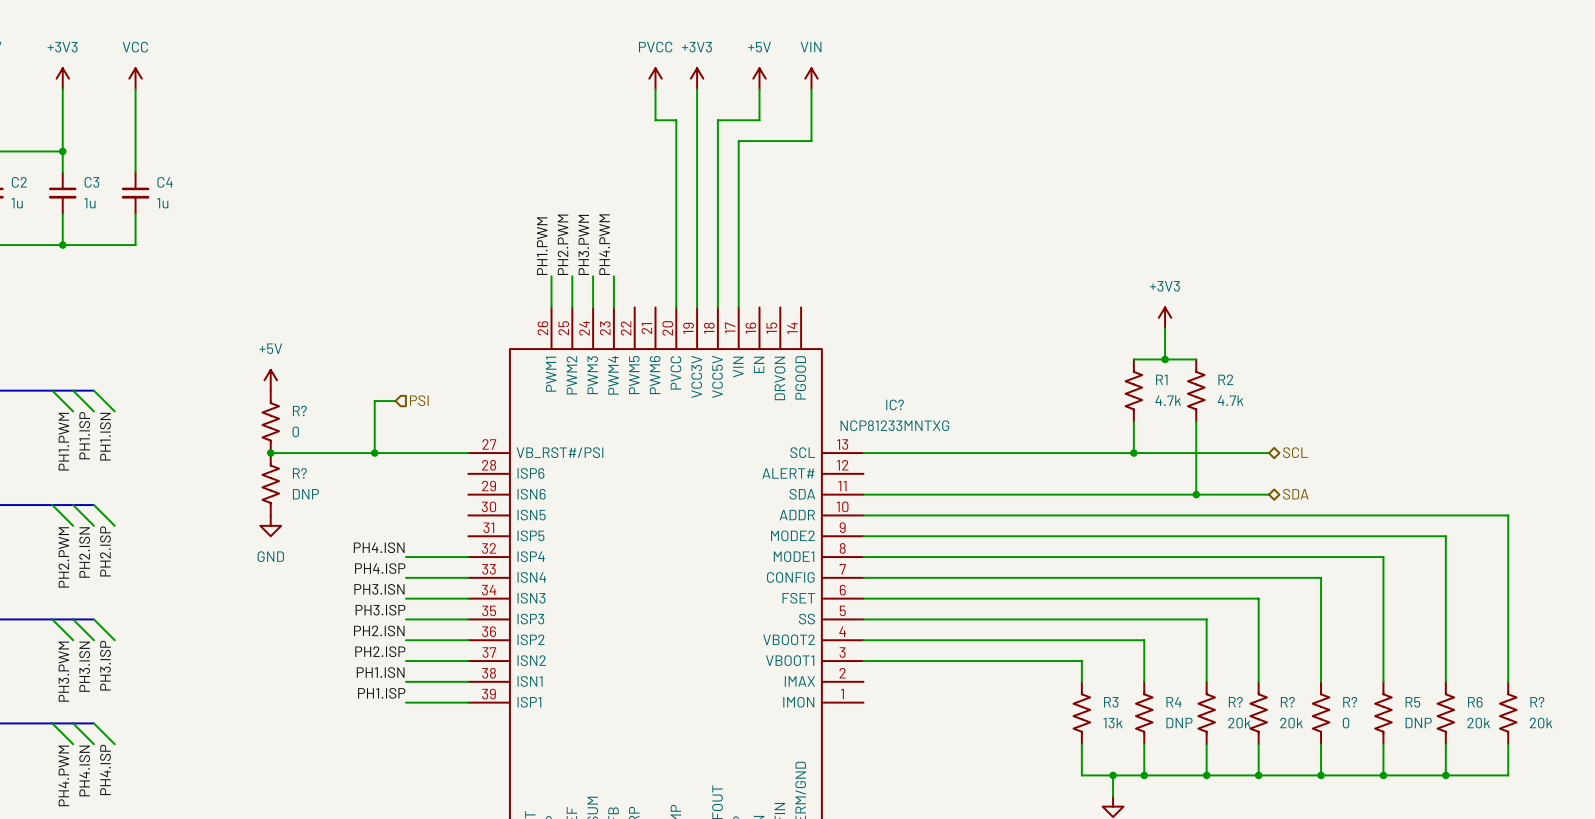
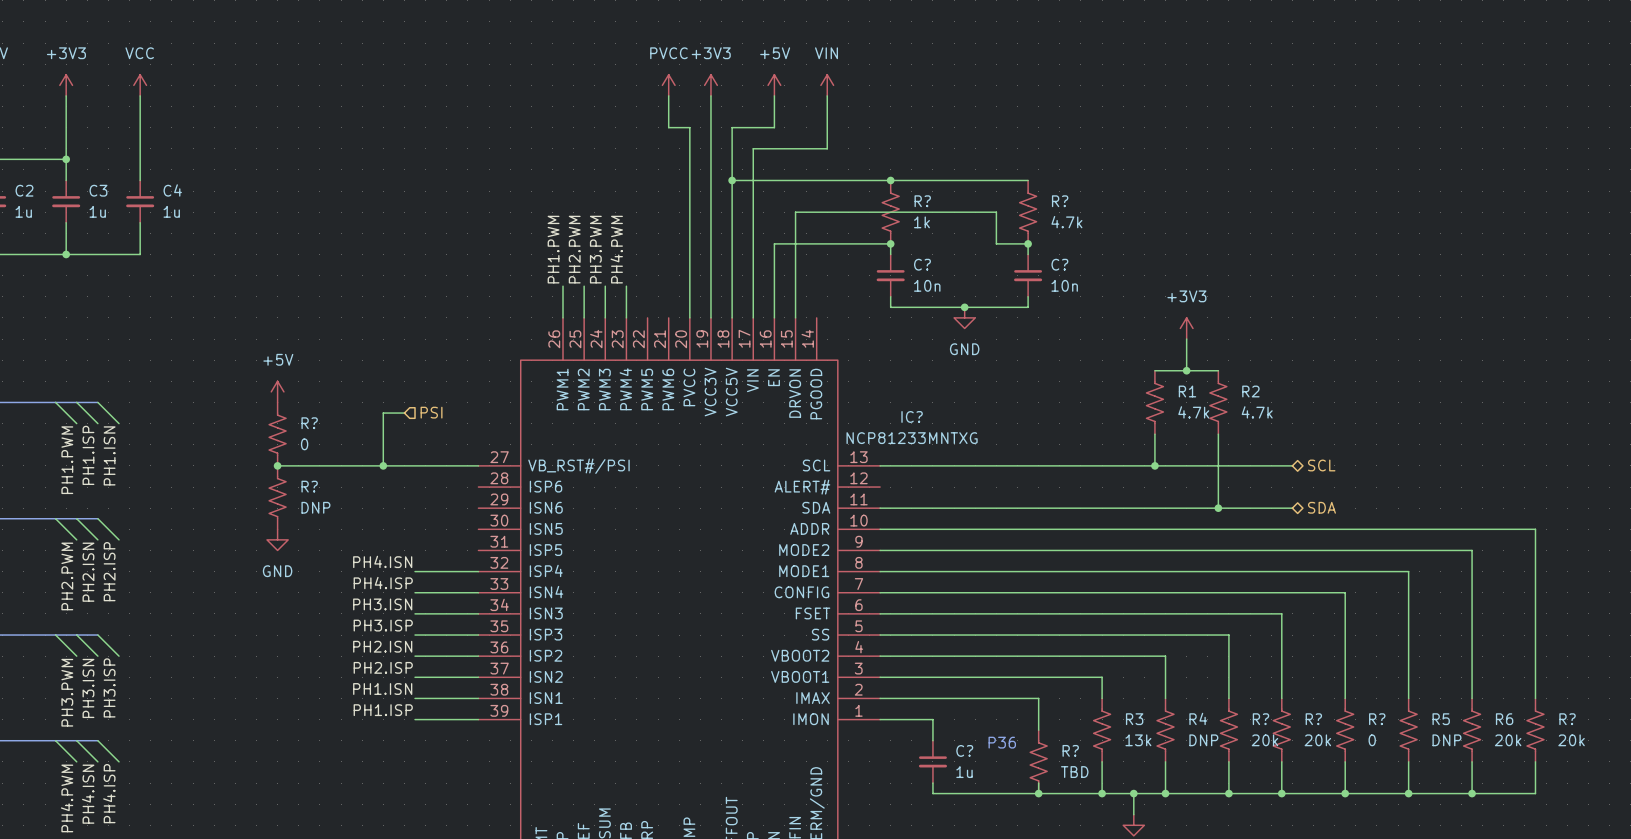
wire: none -> (732, 180) (1028, 180)
junction: none -> (732, 180)
junction: none -> (890, 180)
R?: none -> 1k (890, 212)
R?: none -> 4.7k (1028, 212)
junction: none -> (890, 243)
junction: none -> (1028, 243)
wire: none -> (890, 254) (890, 243) (774, 243) (774, 317)
wire: none -> (1028, 254) (1028, 243) (996, 243) (996, 212) (795, 212) (795, 317)
C?: none -> 10n (890, 275)
C?: none -> 10n (1028, 275)
wire: none -> (890, 296) (890, 307) (1028, 307) (1028, 296)
junction: none -> (964, 307)
power symbol: none -> GND (964, 317)
wire: none -> (880, 698) (1038, 698) (1038, 730)
wire: none -> (880, 719) (932, 719) (932, 740)
text: none -> P36 (1002, 742)
C?: none -> 1u (932, 761)
R?: none -> TBD (1038, 761)
wire: none -> (932, 783) (932, 793) (1102, 793)
wire: none -> (1038, 783) (1038, 793)
junction: none -> (1038, 793)
junction: none -> (1102, 793)

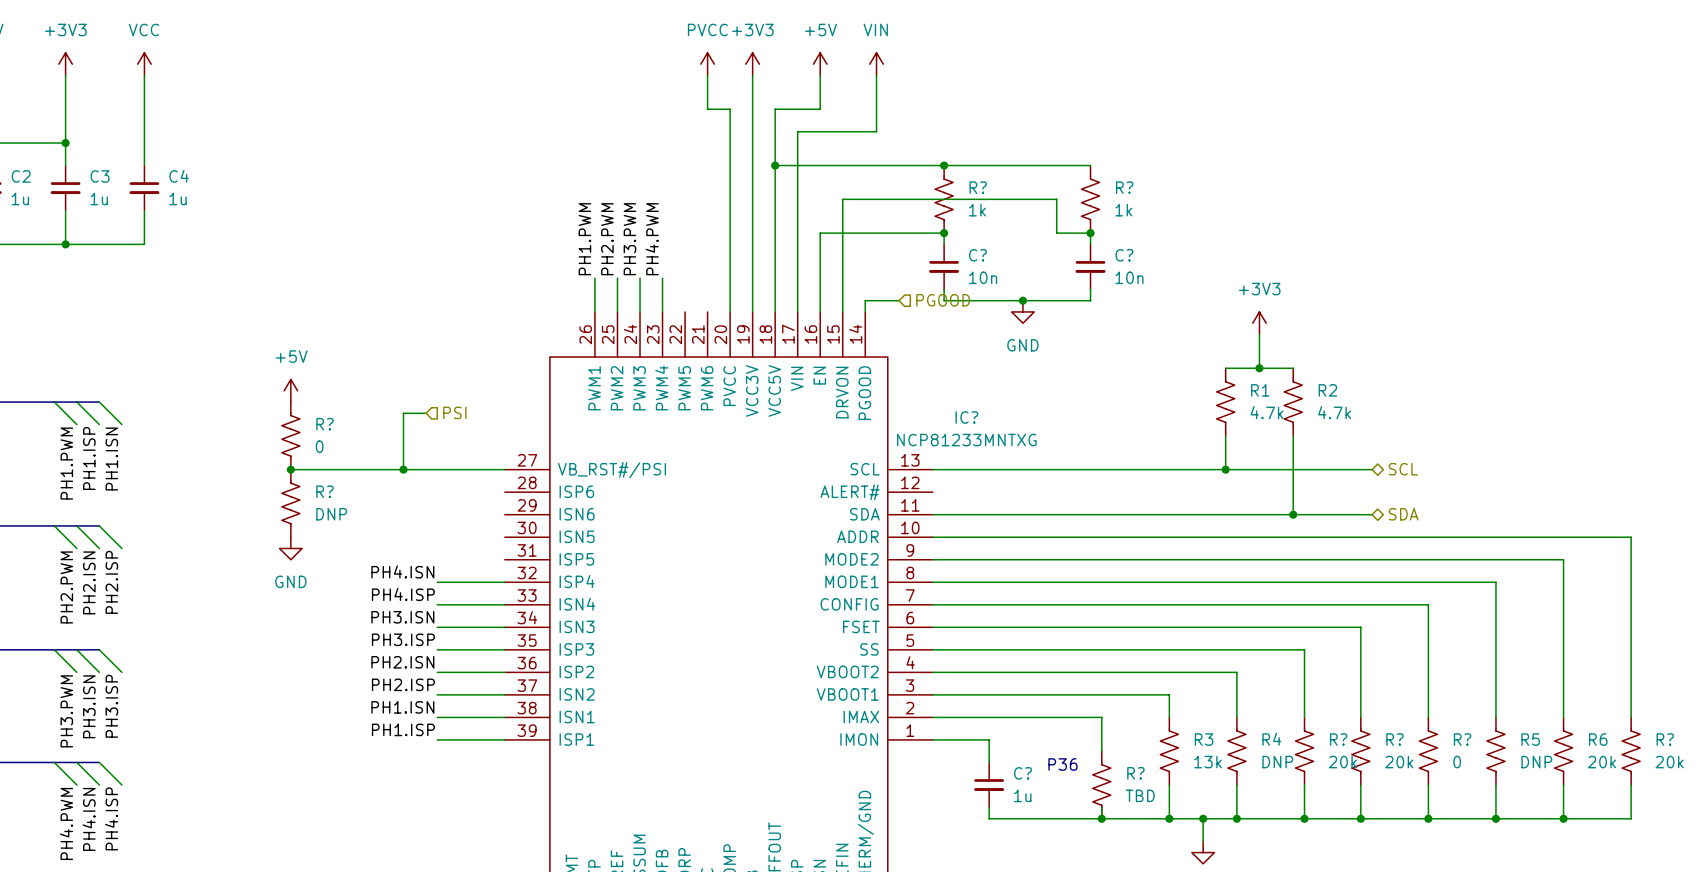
R? value: 4.7k (1066, 222) -> 1k (1123, 210)
hierarchical label: none -> PGOOD (943, 300)
wire: none -> (899, 300) (865, 300) (865, 311)

